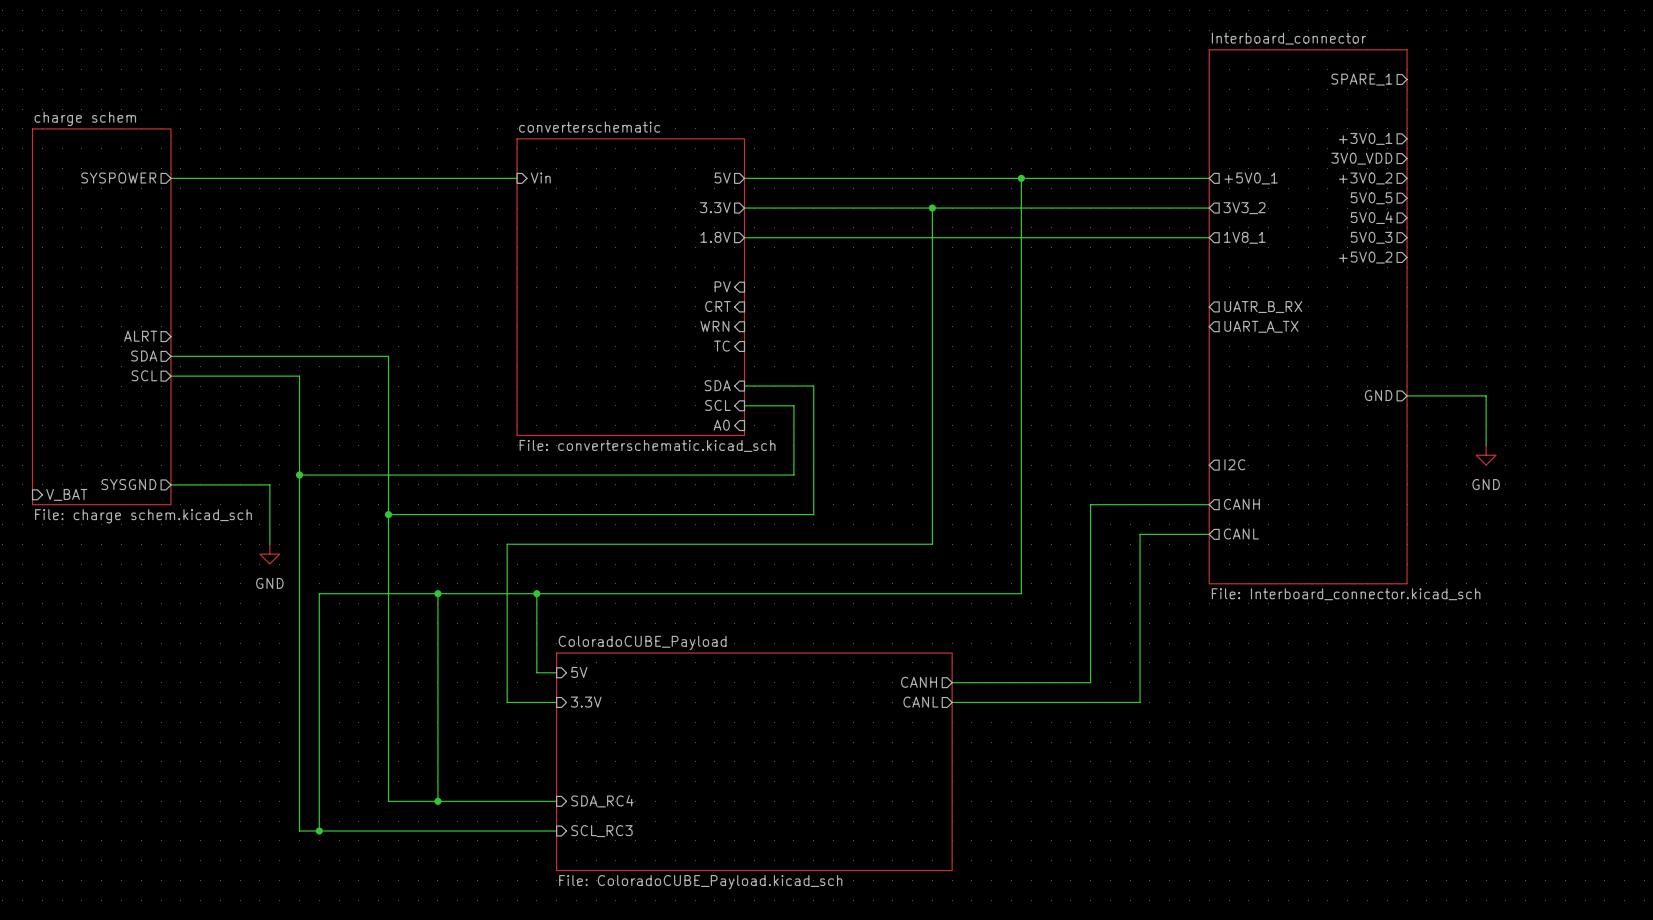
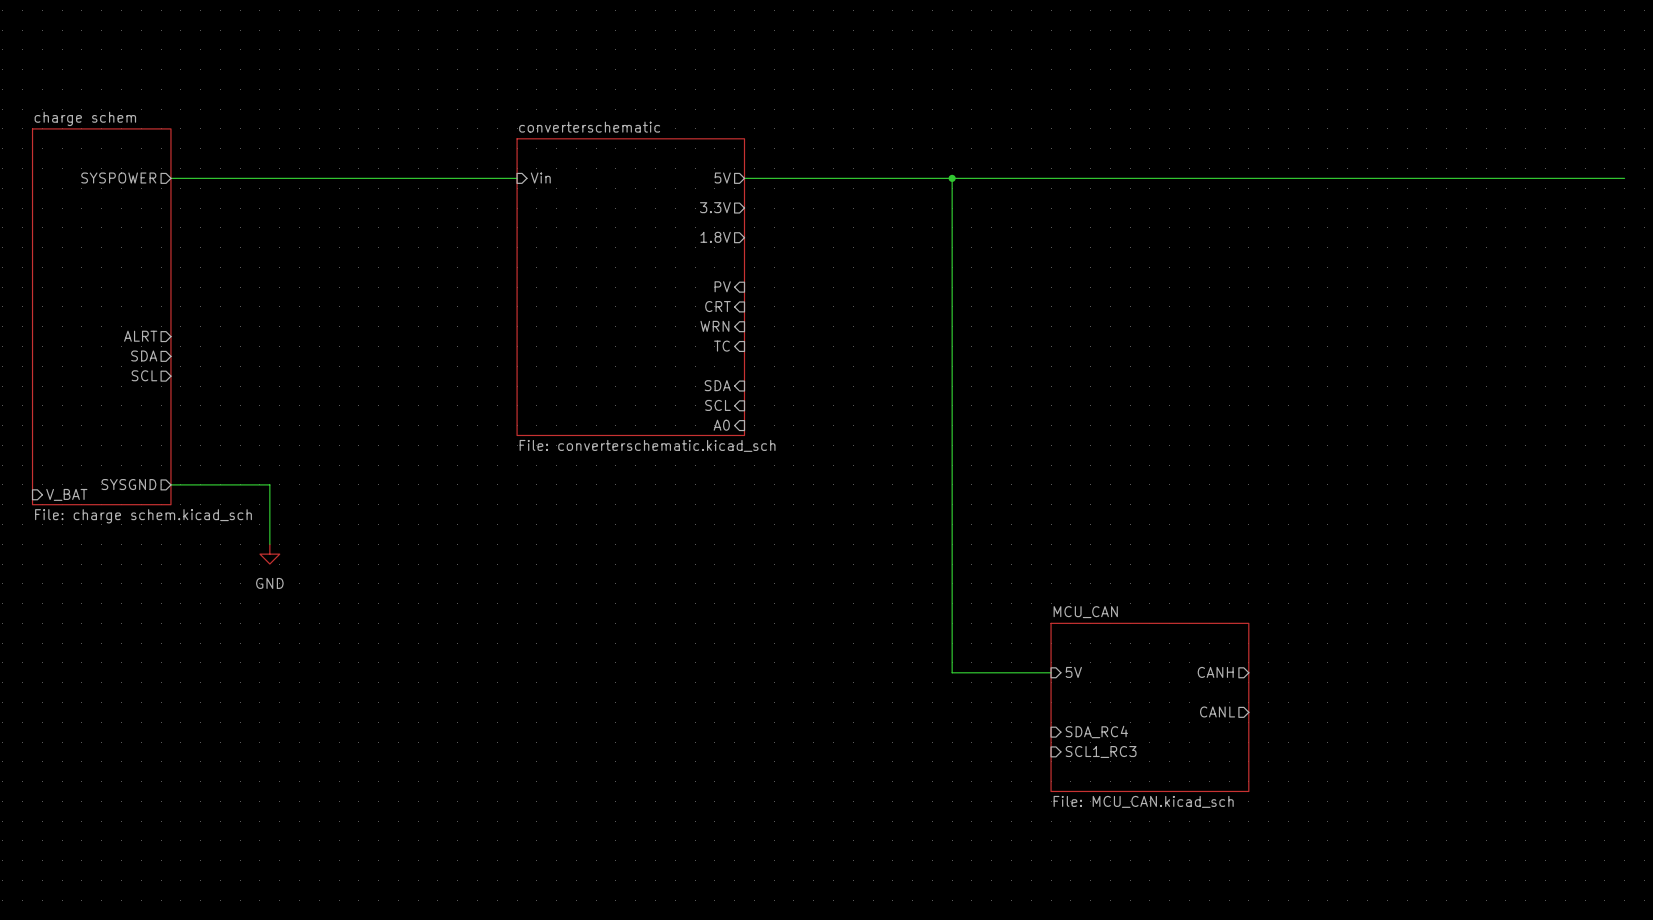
sheet pin: SPARE_1 (1361, 79) -> none
sheet pin: +3V0_1 (1365, 138) -> none
sheet pin: 3V0_VDD (1361, 158) -> none
wire: none -> (952, 178) (952, 672) (1051, 672)
junction: none -> (952, 178)
wire: (1021, 178) (1021, 593) (319, 593) (319, 831) -> none
junction: (1021, 178) -> none
wire: none -> (1209, 178) (1624, 178)
sheet pin: +5V0_1 (1251, 178) -> none
sheet pin: +3V0_2 (1365, 178) -> none
sheet pin: 5V0_5 (1371, 198) -> none
wire: (744, 208) (1209, 208) -> none
wire: (932, 208) (932, 544) (507, 544) (507, 702) (556, 702) -> none
junction: (932, 208) -> none
sheet pin: 3V3_2 (1244, 208) -> none
sheet pin: 5V0_4 (1371, 217) -> none
wire: (744, 237) (1209, 237) -> none
sheet pin: 1V8_1 (1244, 237) -> none
sheet pin: 5V0_3 (1371, 237) -> none
sheet pin: +5V0_2 (1365, 257) -> none
sheet pin: UATR_B_RX (1263, 307) -> none
sheet Interboard_connector: File: Interboard_connector.kicad_sch (1308, 316) -> none
sheet pin: UART_A_TX (1261, 326) -> none
wire: (170, 356) (388, 356) (388, 801) (556, 801) -> none
wire: (170, 376) (299, 376) (299, 831) (556, 831) -> none
wire: (744, 386) (813, 386) (813, 514) (388, 514) -> none
sheet pin: GND (1378, 395) -> none
wire: (1407, 395) (1486, 395) (1486, 445) -> none
wire: (744, 405) (793, 405) (793, 475) (299, 475) -> none
power symbol: GND (1486, 455) -> none
sheet pin: I2C (1234, 464) -> none
junction: (299, 475) -> none
wire: (1209, 504) (1090, 504) (1090, 682) (952, 682) -> none
sheet pin: CANH (1241, 504) -> none
junction: (388, 514) -> none
sheet pin: CANL (1241, 533) -> none
wire: (1209, 534) (1140, 534) (1140, 702) (952, 702) -> none
wire: (437, 593) (437, 801) -> none
junction: (437, 593) -> none
wire: (536, 593) (536, 672) (556, 672) -> none
junction: (536, 593) -> none
sheet pin: 5V (579, 672) -> none
sheet pin: none -> 5V (1073, 672)
sheet pin: none -> CANH (1215, 672)
sheet pin: CANH (919, 682) -> none
sheet pin: 3.3V (586, 702) -> none
sheet pin: CANL (920, 702) -> none
sheet MCU_CAN: none -> File: MCU_CAN.kicad_sch (1149, 707)
sheet pin: none -> CANL (1217, 711)
sheet pin: none -> SDA_RC4 (1096, 731)
sheet pin: none -> SCL1_RC3 (1101, 752)
sheet ColoradoCUBE_Payload: File: ColoradoCUBE_Payload.kicad_sch (754, 761) -> none
junction: (437, 801) -> none
sheet pin: SDA_RC4 (602, 801) -> none
junction: (319, 831) -> none
sheet pin: SCL_RC3 (601, 831) -> none

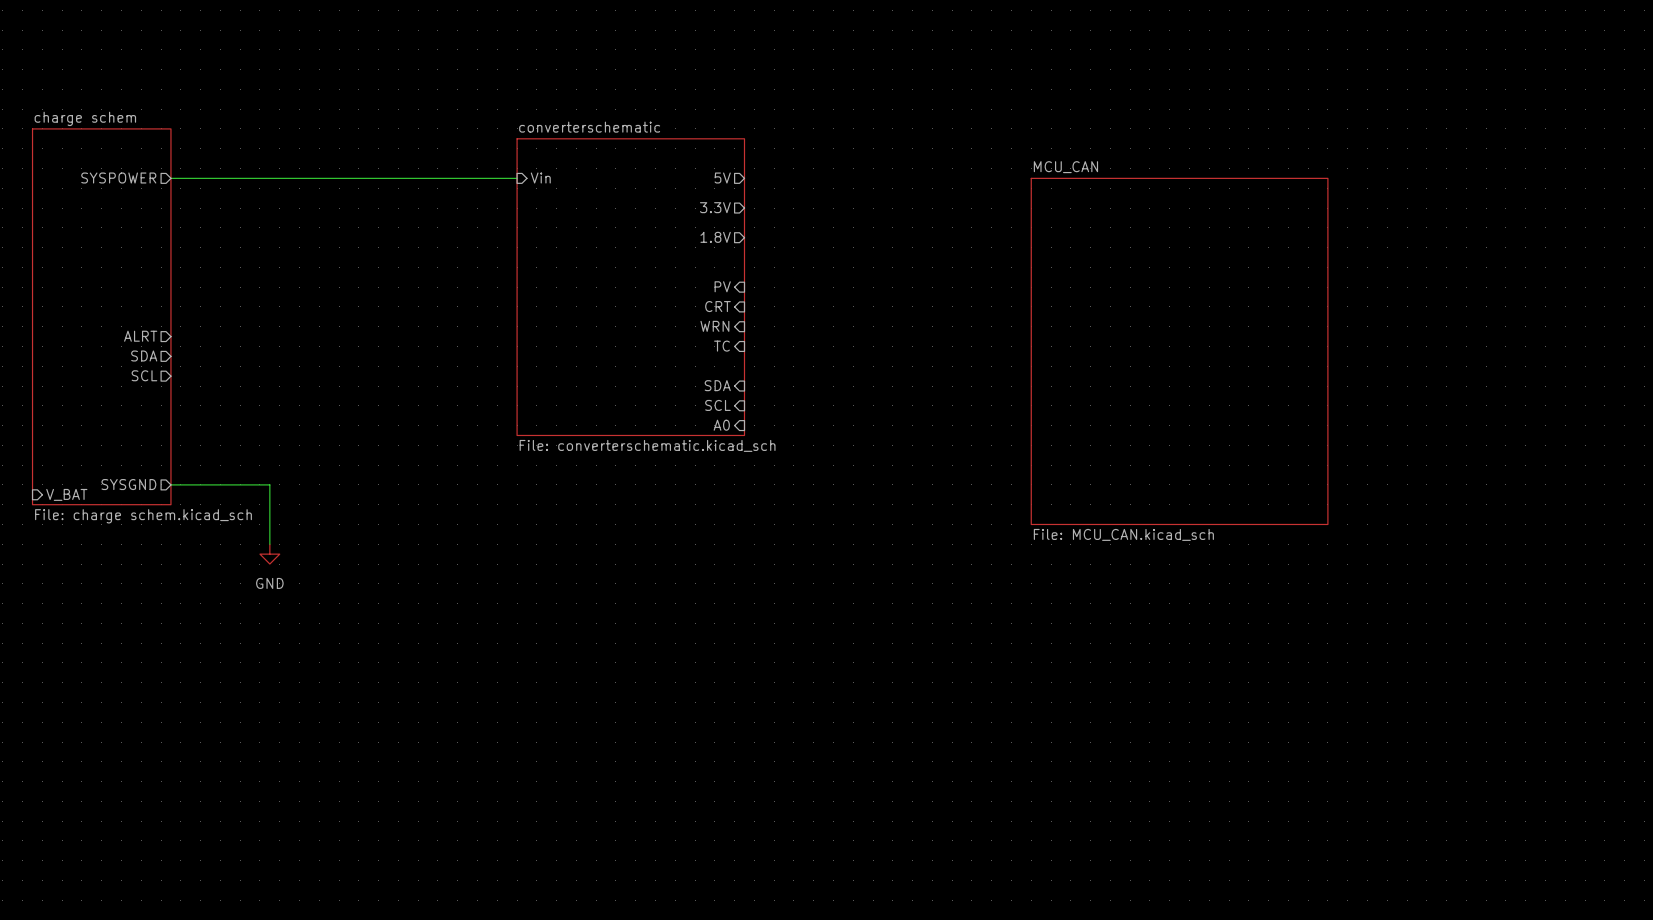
wire: (744, 178) (1624, 178) -> none
wire: (952, 178) (952, 672) (1051, 672) -> none
junction: (952, 178) -> none
sheet MCU_CAN: none -> File: MCU_CAN.kicad_sch (1179, 351)
sheet pin: 5V (1073, 672) -> none
sheet pin: CANH (1215, 672) -> none
sheet MCU_CAN: File: MCU_CAN.kicad_sch (1149, 707) -> none
sheet pin: CANL (1217, 711) -> none
sheet pin: SDA_RC4 (1096, 731) -> none
sheet pin: SCL1_RC3 (1101, 752) -> none

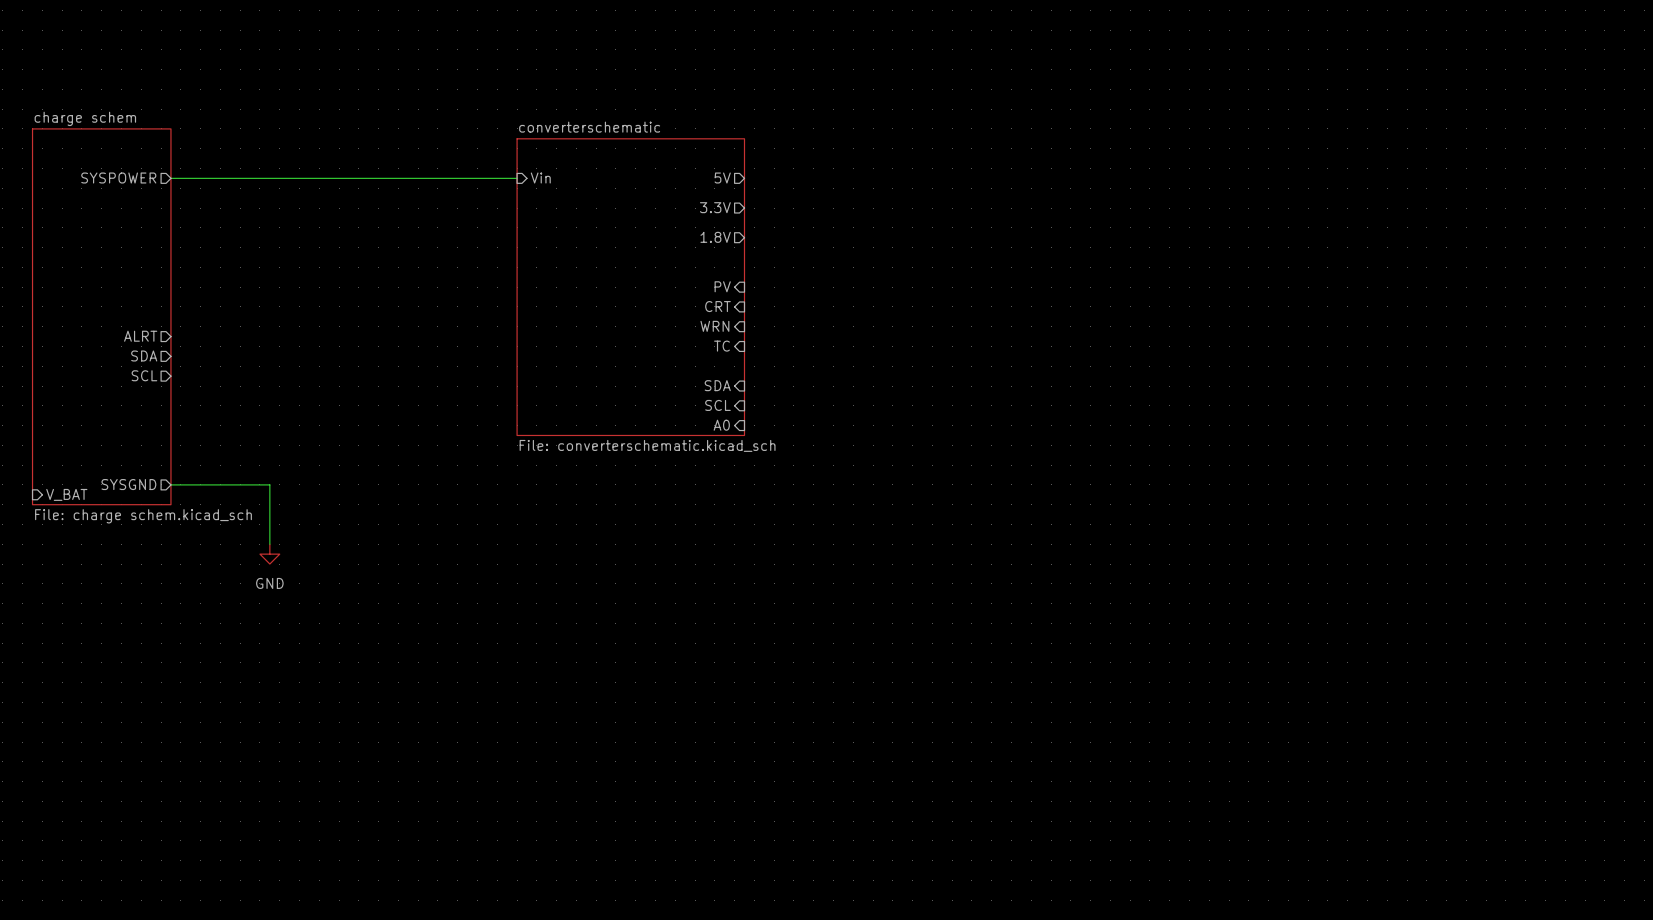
sheet MCU_CAN: File: MCU_CAN.kicad_sch (1179, 351) -> none

